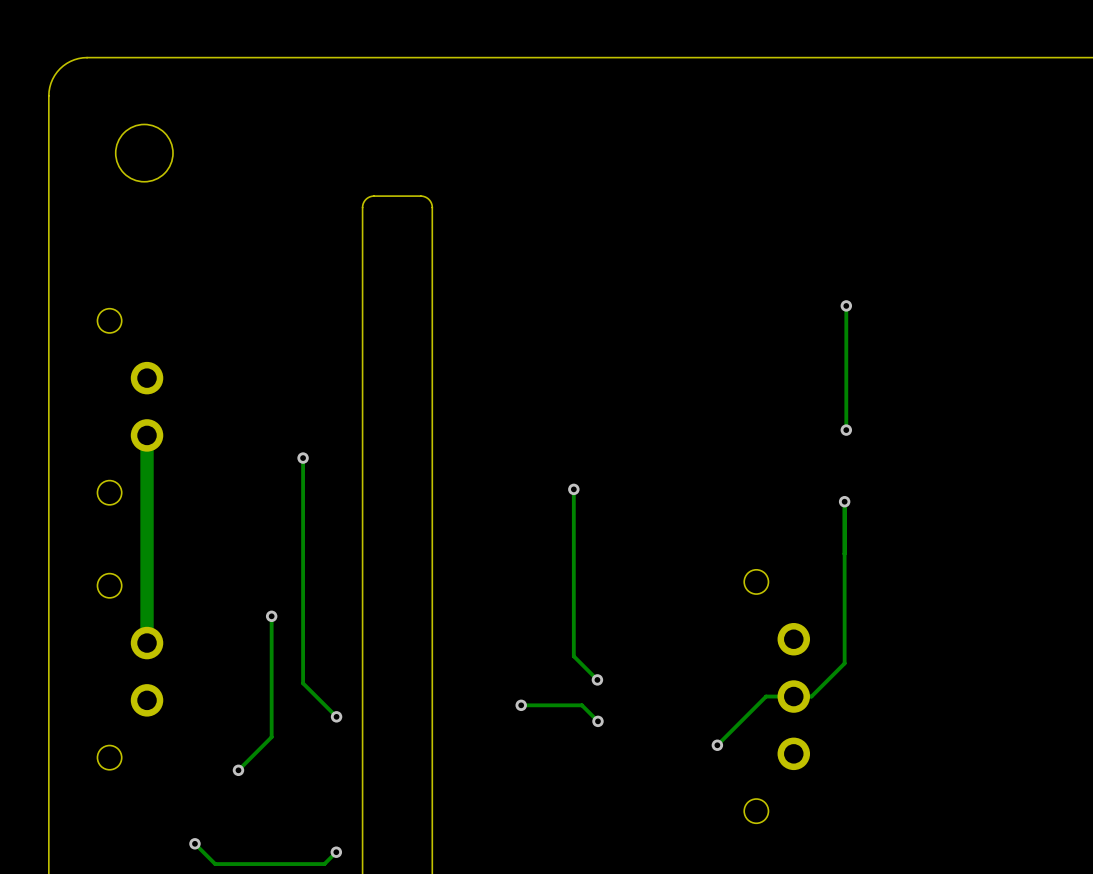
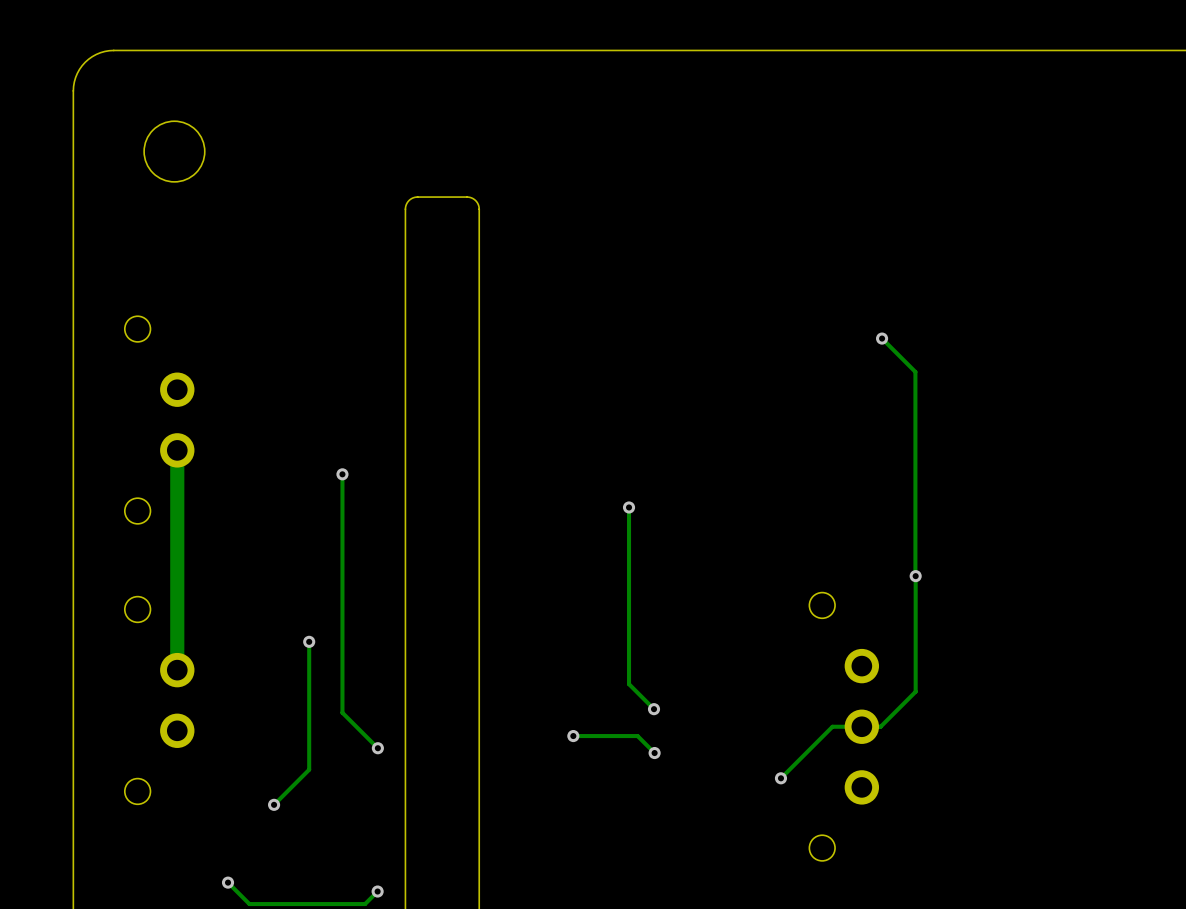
track: (846, 305) (846, 430) -> none
via position: (846, 305) -> (882, 338)
via: (846, 430) -> none
track: (844, 501) (844, 554) -> (882, 338) (915, 371) (915, 575)
via position: (844, 501) -> (915, 576)

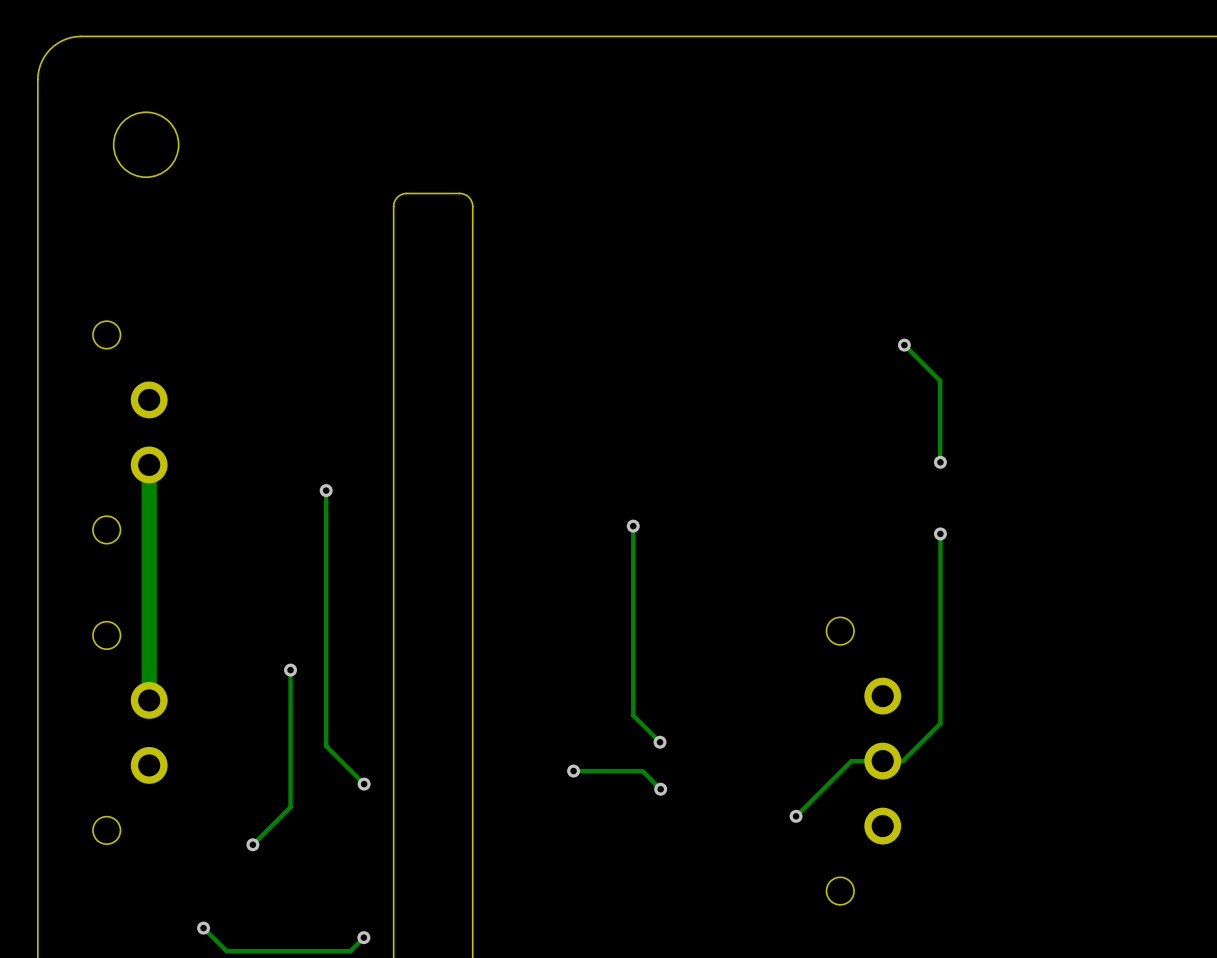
track: (915, 447) (915, 575) -> (940, 533) (940, 599)
via: none -> (940, 462)
via position: (915, 576) -> (940, 533)

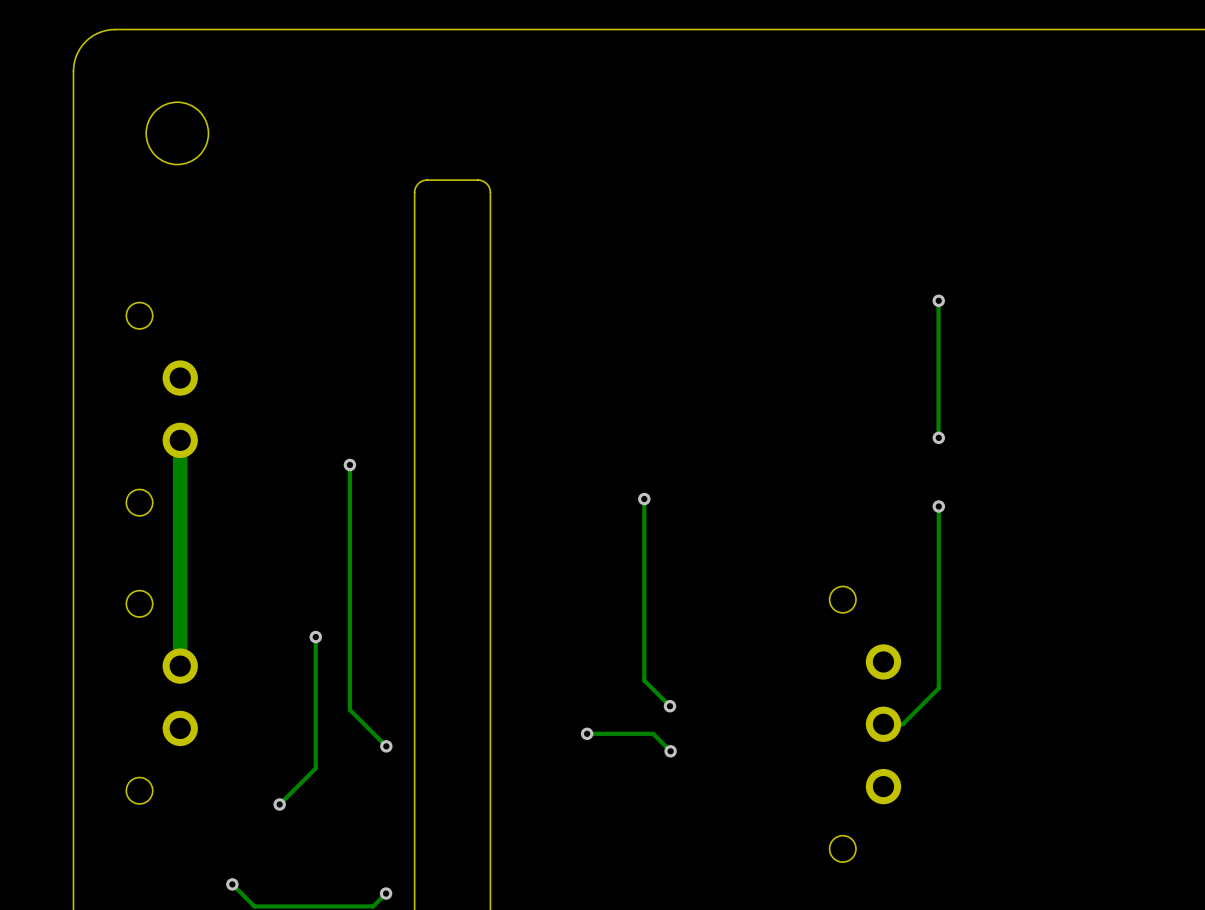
track: (904, 345) (940, 380) -> (938, 300) (938, 359)
via position: (904, 345) -> (938, 300)
track: (882, 761) (851, 761) (796, 816) -> none
via: (796, 816) -> none

